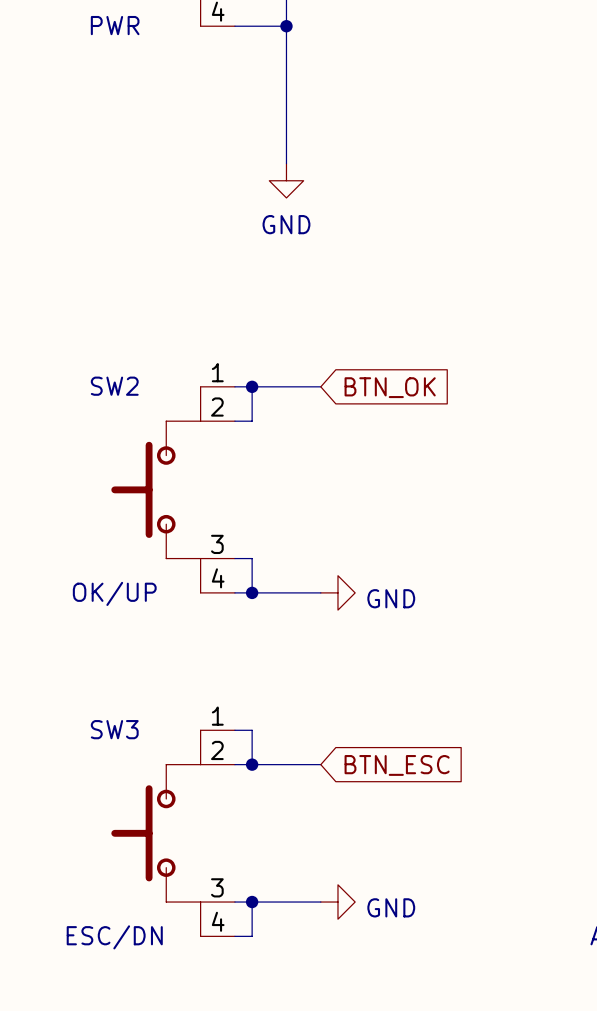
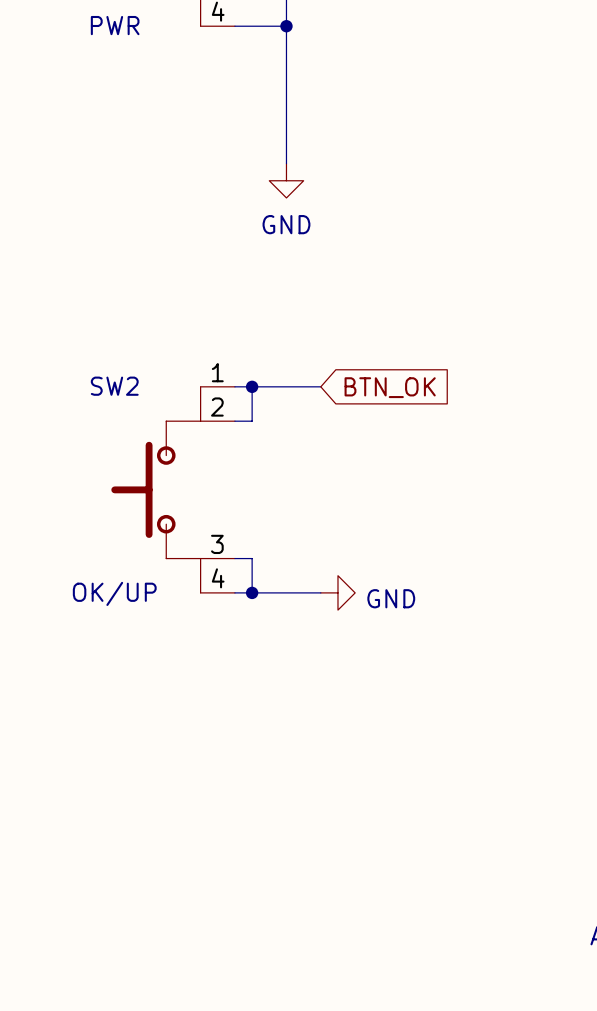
wire: (234, 730) (252, 730) (252, 764) -> none
wire: (234, 764) (320, 764) -> none
junction: (252, 764) -> none
global label: BTN_ESC (397, 765) -> none
SW3: (173, 833) -> none
wire: (234, 902) (320, 902) -> none
wire: (252, 902) (252, 936) (234, 936) -> none
junction: (252, 902) -> none
power symbol: GND (337, 902) -> none

